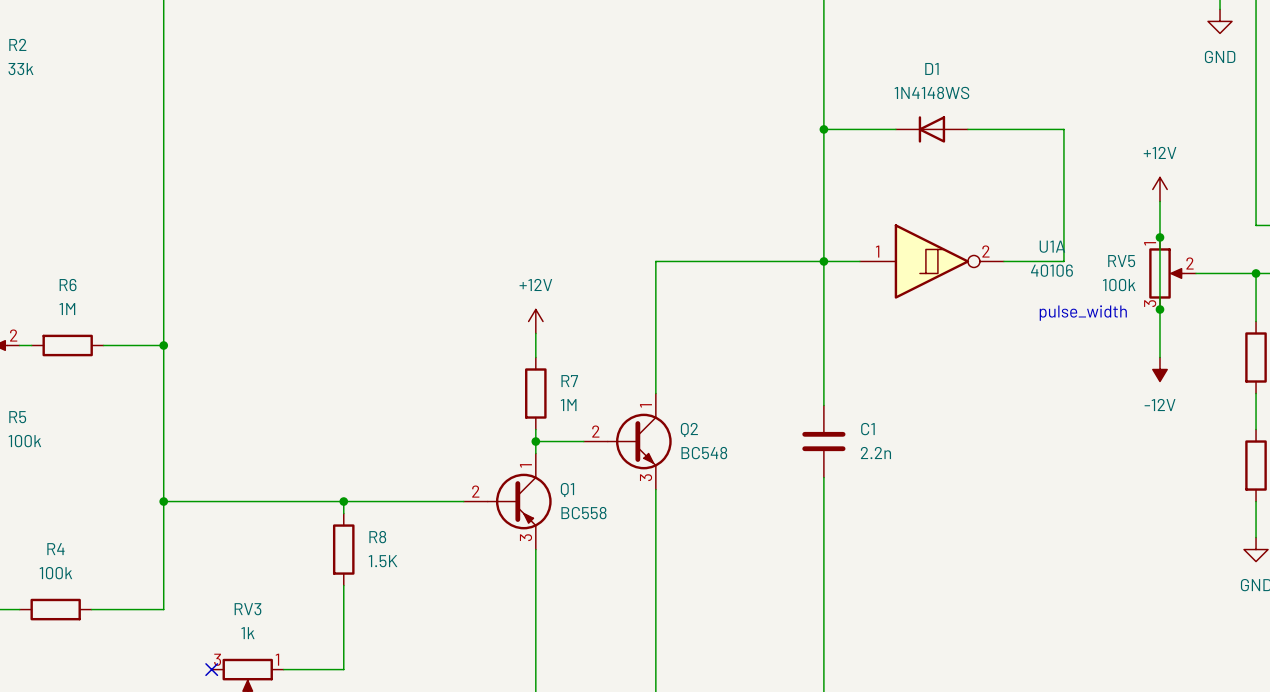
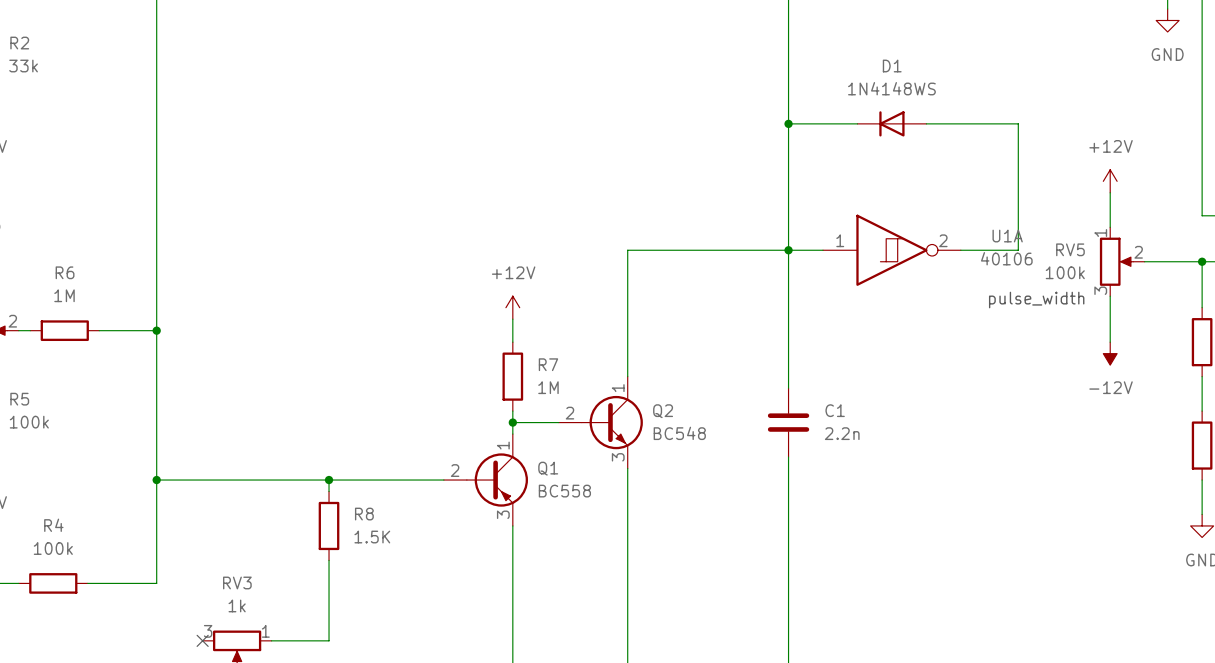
wire: (1159, 237) (1159, 309) -> none
junction: (1159, 237) -> none
junction: (1159, 309) -> none

